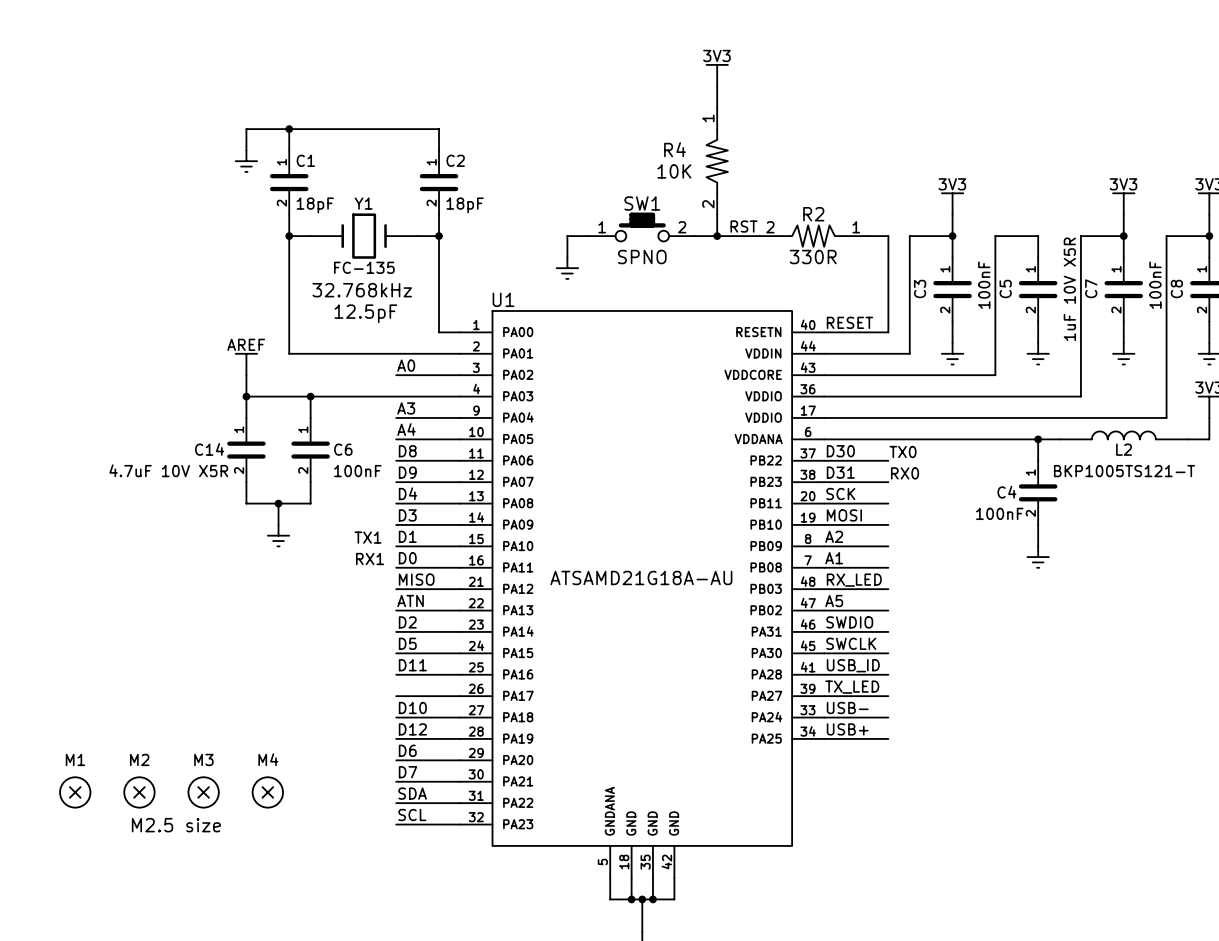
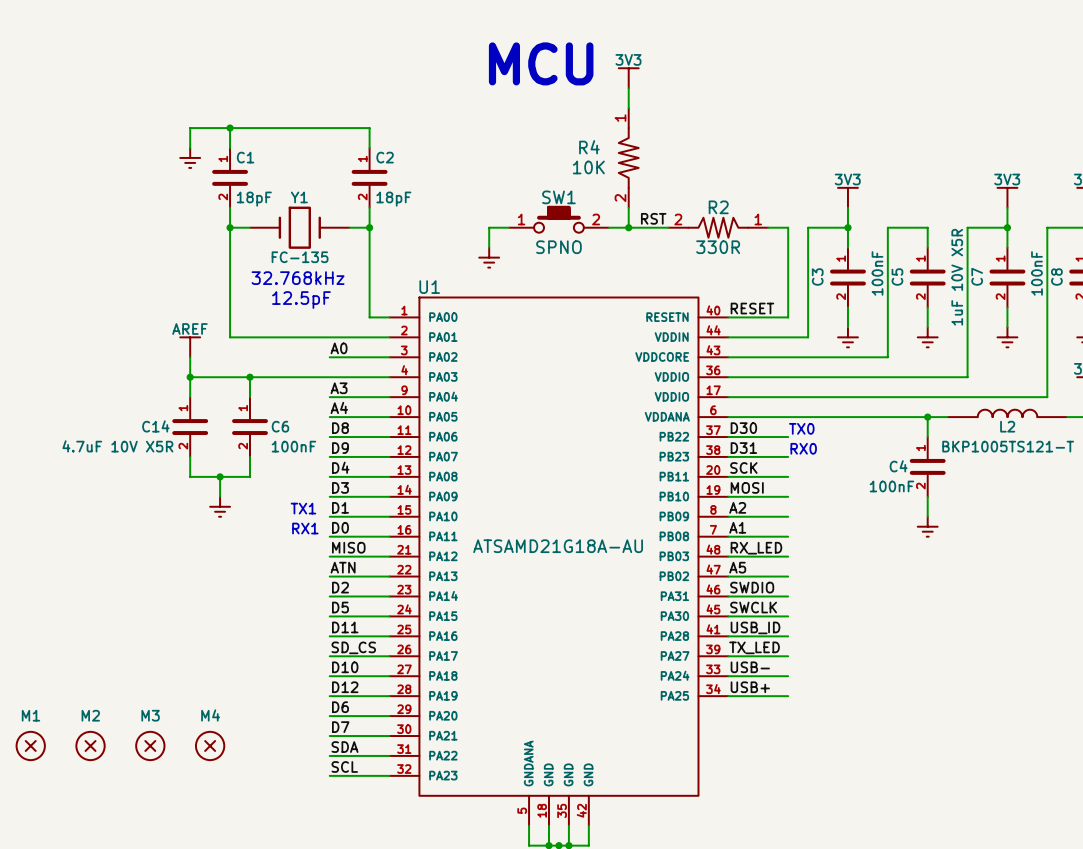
text: none -> MCU (541, 63)
label: none -> SD_CS (353, 647)
text: M2.5 size (176, 825) -> none

